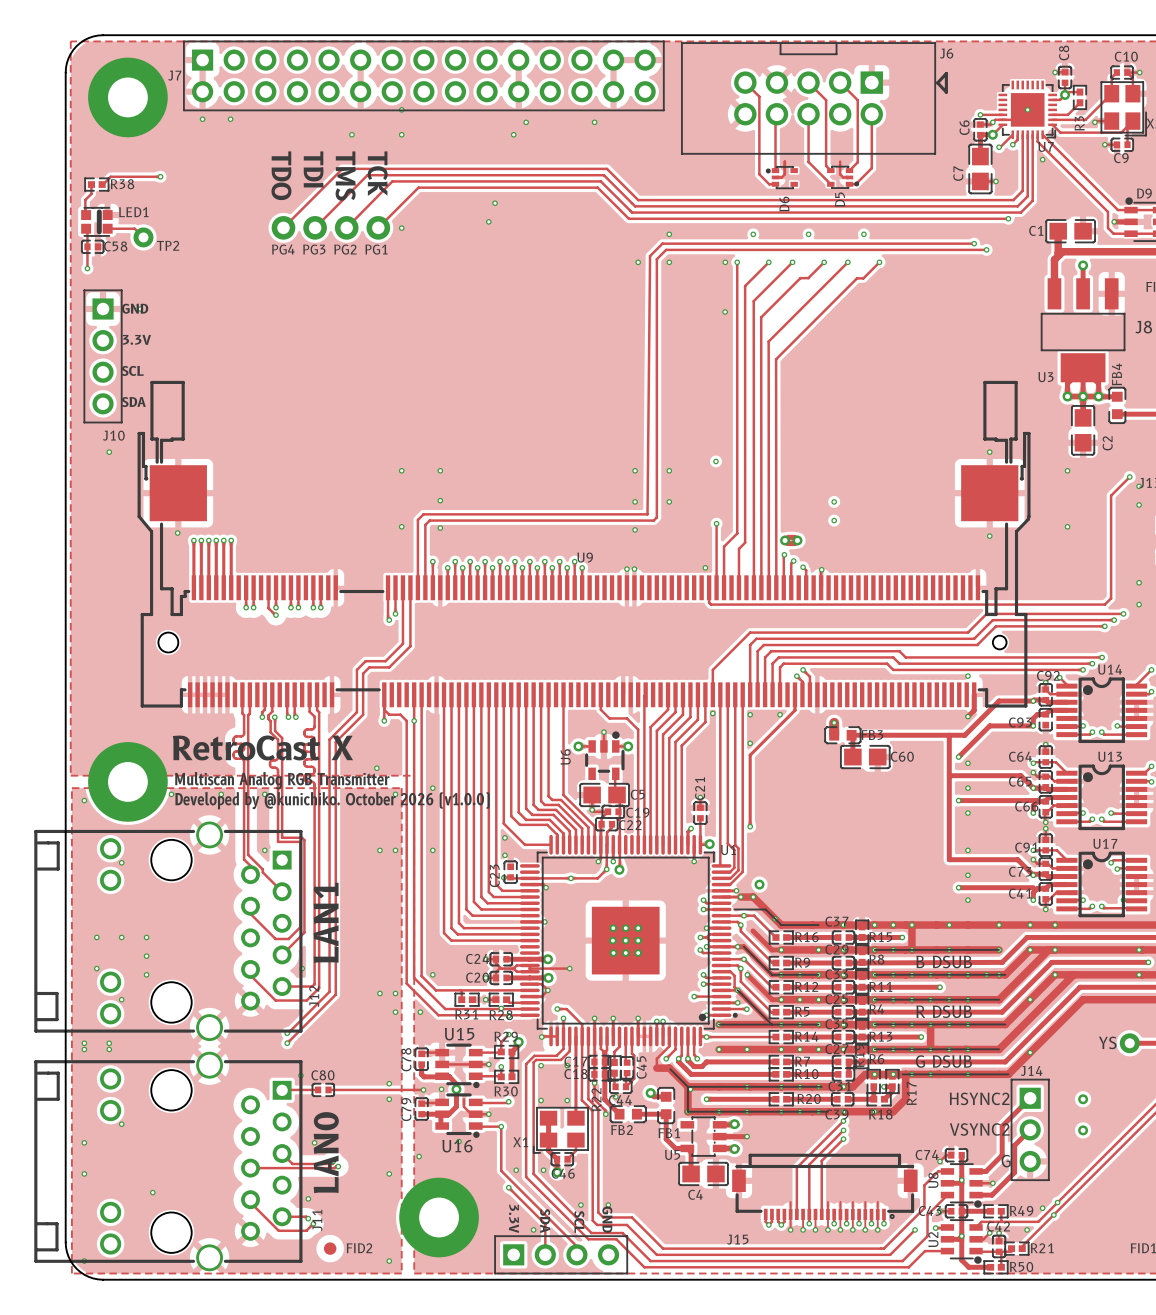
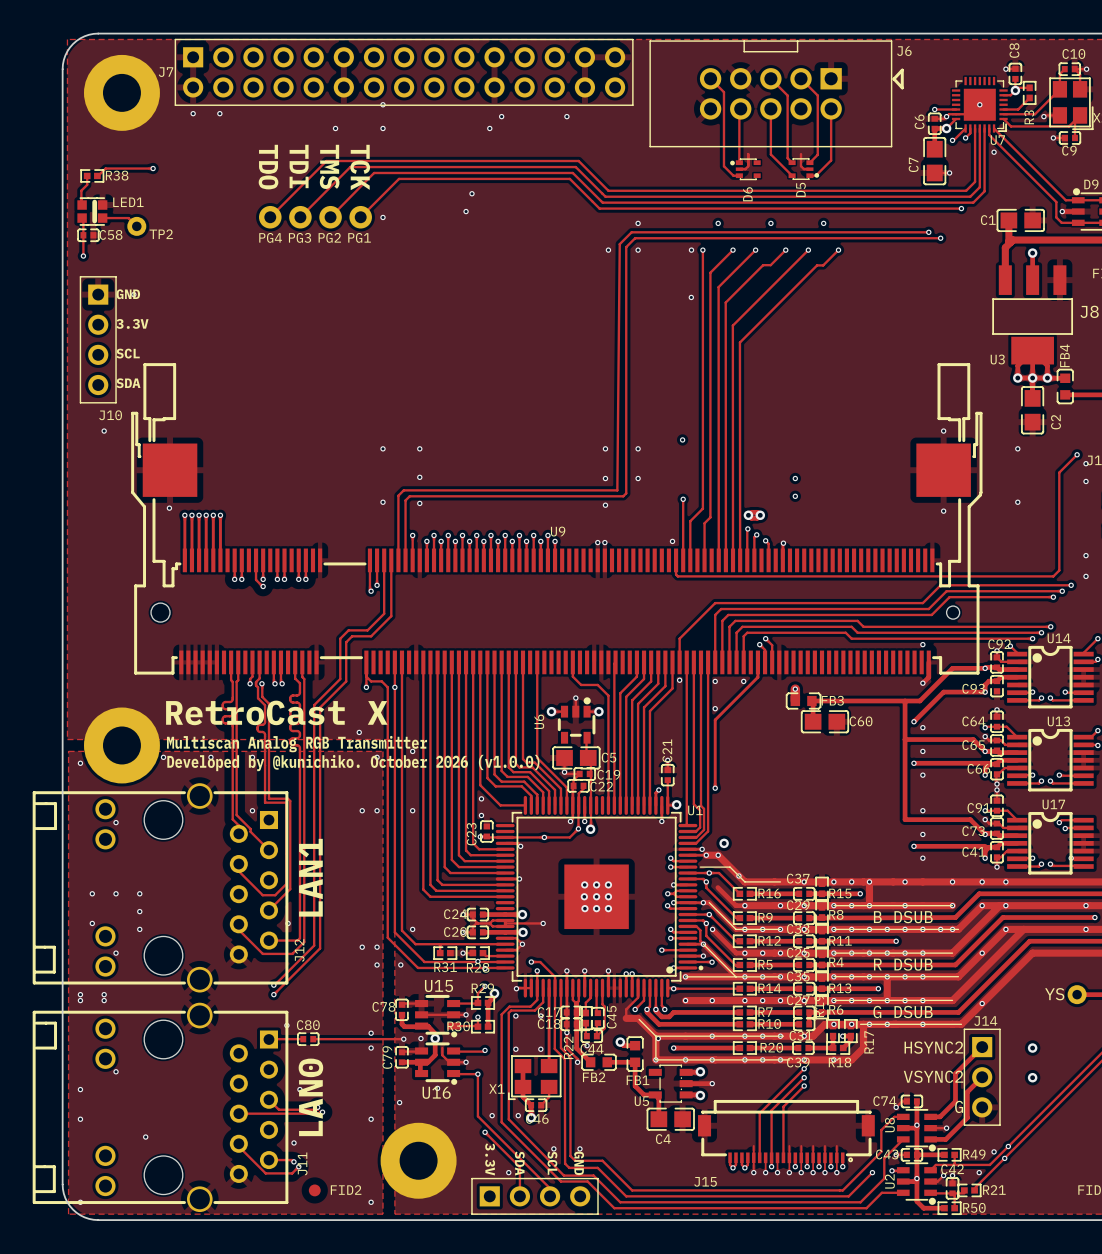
C78 name rotation: 0° (406, 1059) -> 90° clockwise (383, 1006)
R30 name position: R30 (506, 1091) -> R30 (458, 1026)

